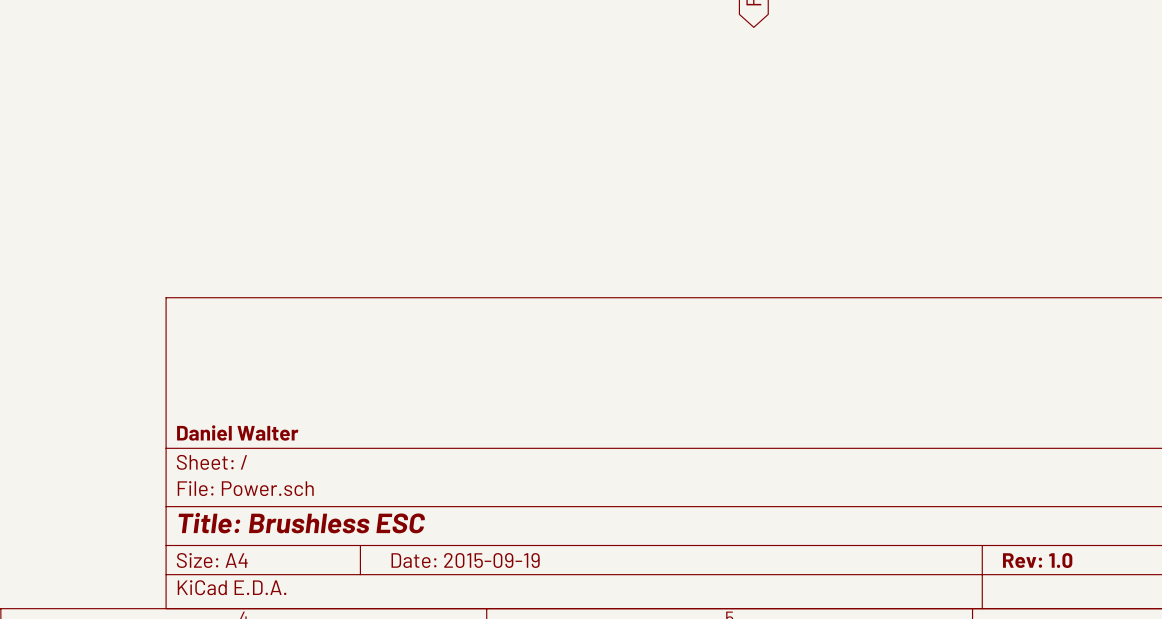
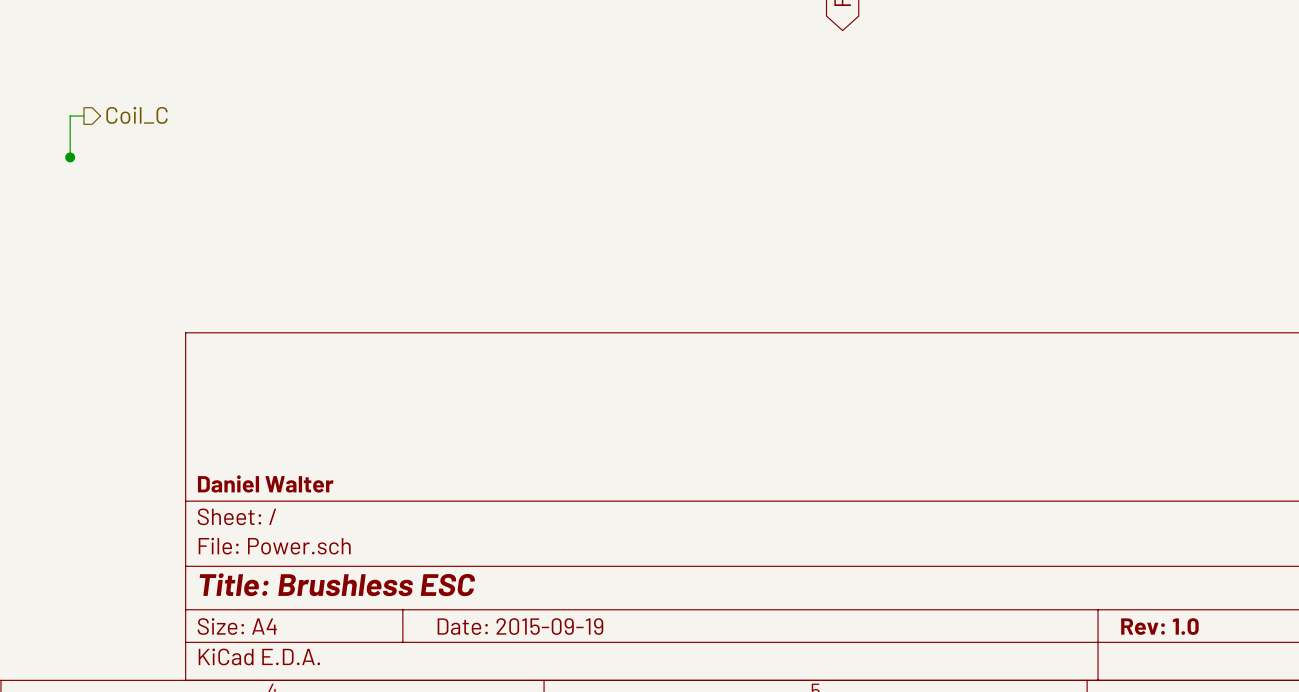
wire: none -> (83, 116) (70, 116) (70, 157)
hierarchical label: none -> Coil_C (136, 115)
junction: none -> (70, 157)

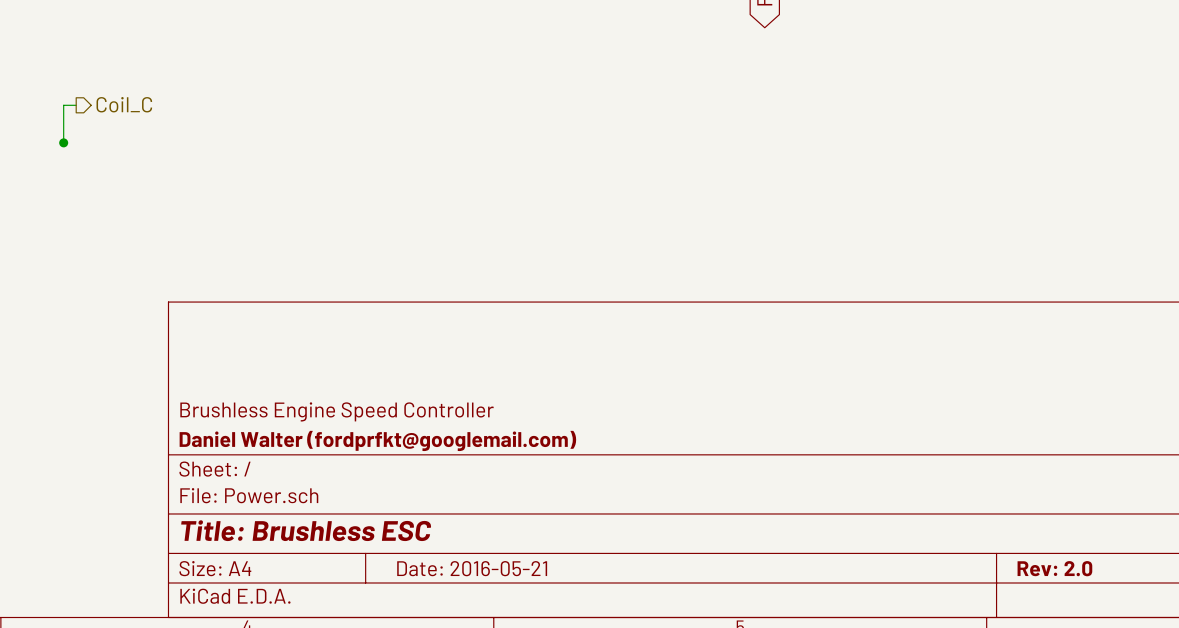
title block: none -> Brushless Engine Speed Controller (337, 411)
title block: Daniel Walter (265, 483) -> Daniel Walter (fordprfkt@googlemail.com) (377, 440)
title block: Date: 2015-09-19 (520, 626) -> Date: 2016-05-21 (472, 568)
title block: Rev: 1.0 (1159, 626) -> Rev: 2.0 (1054, 568)

